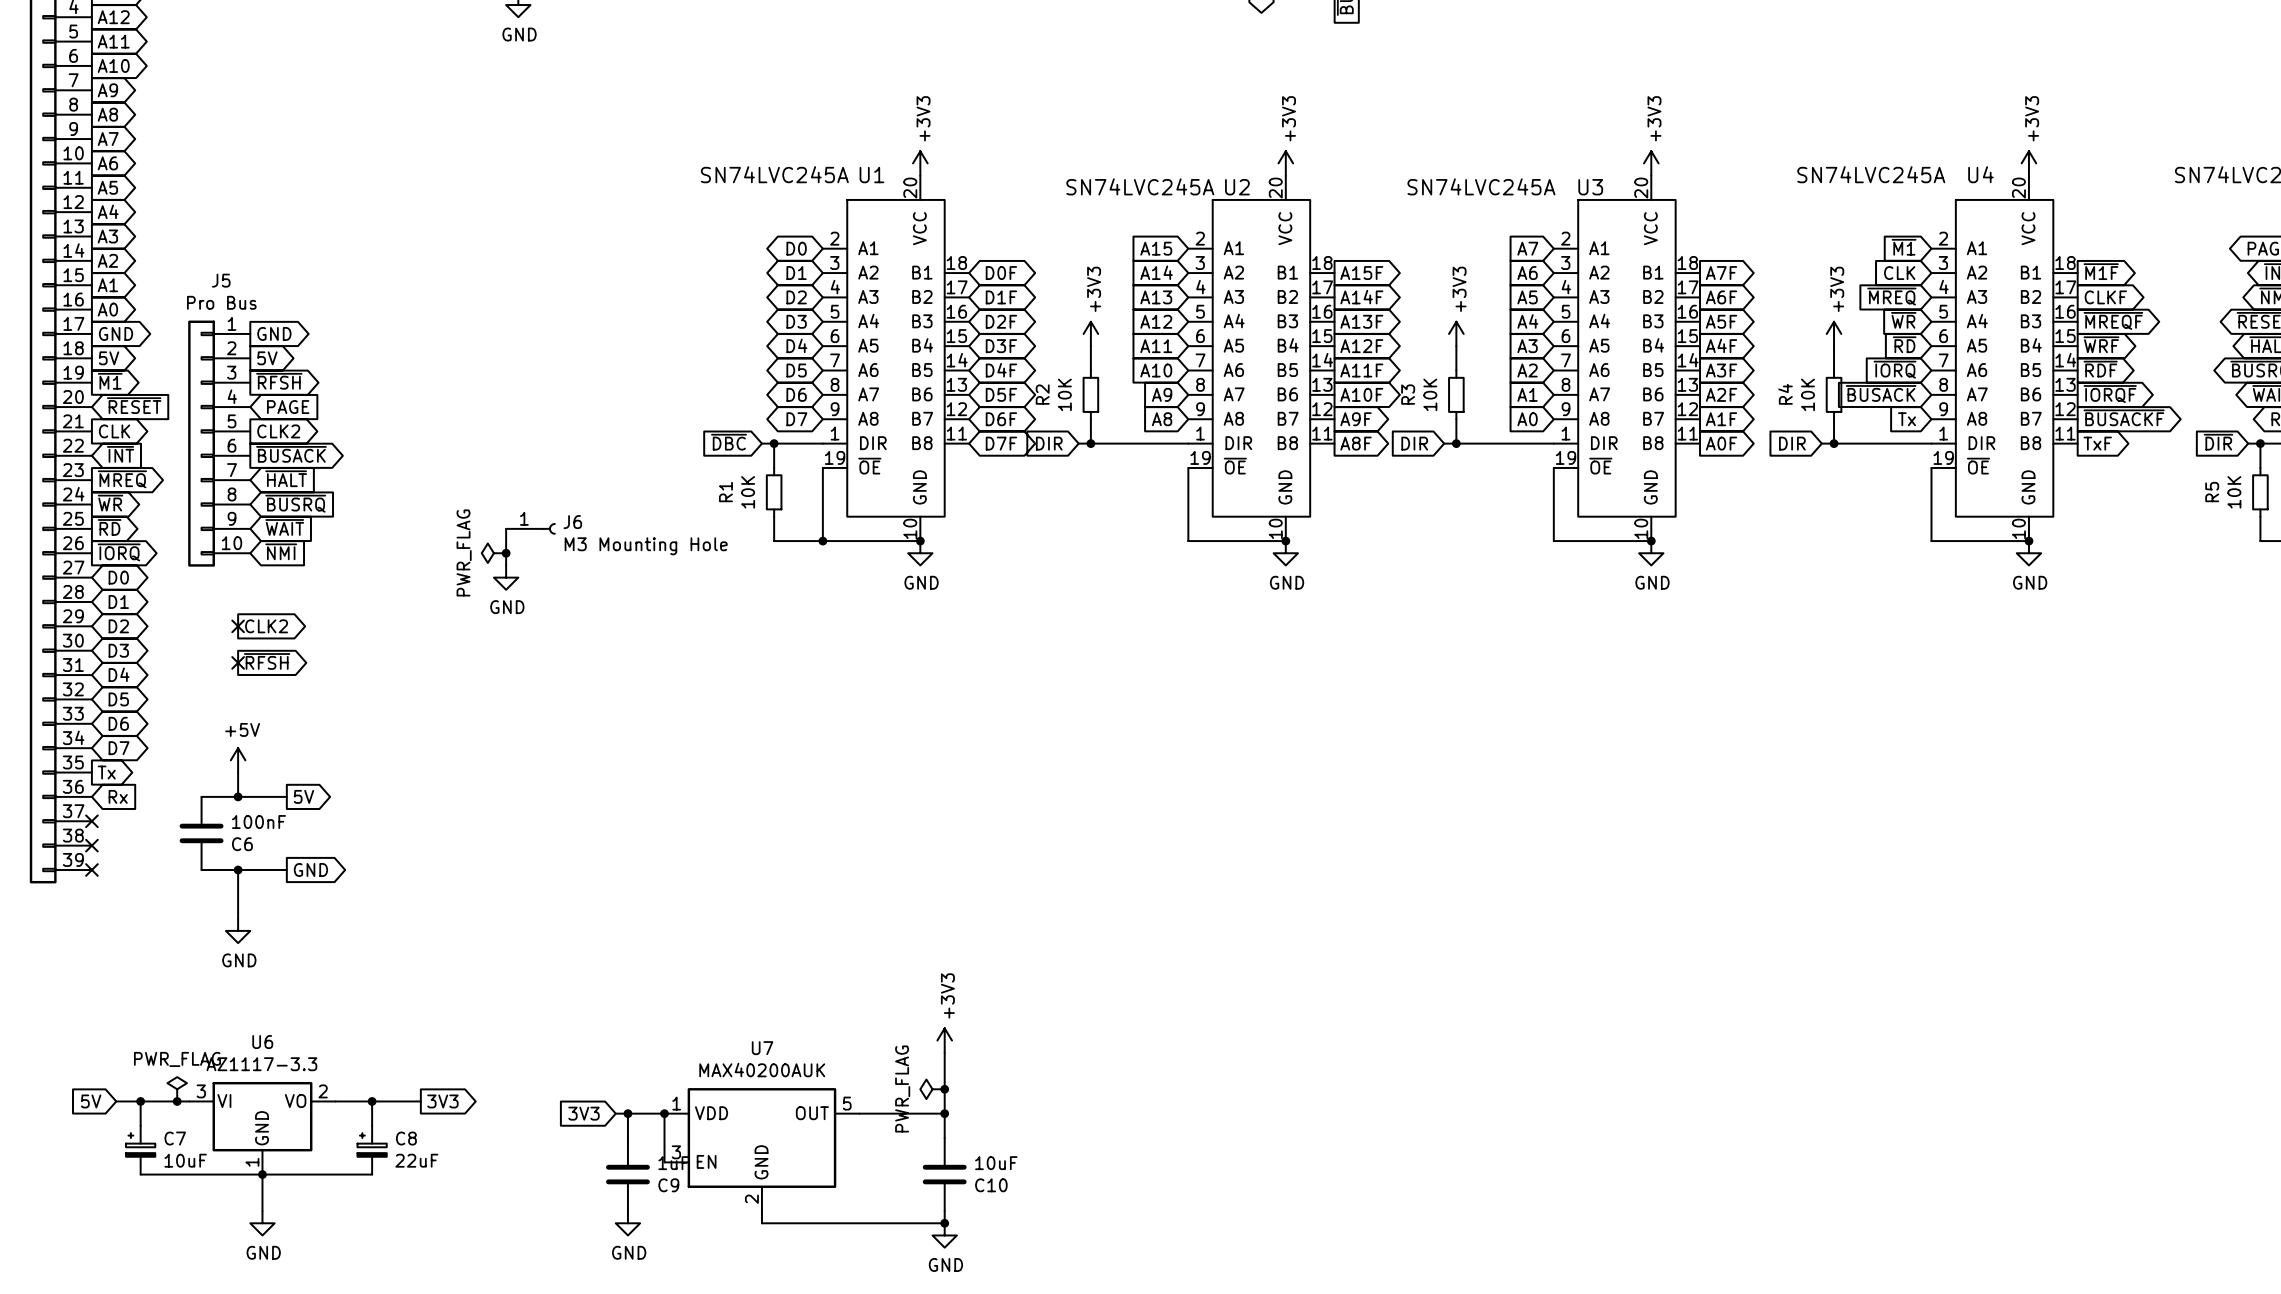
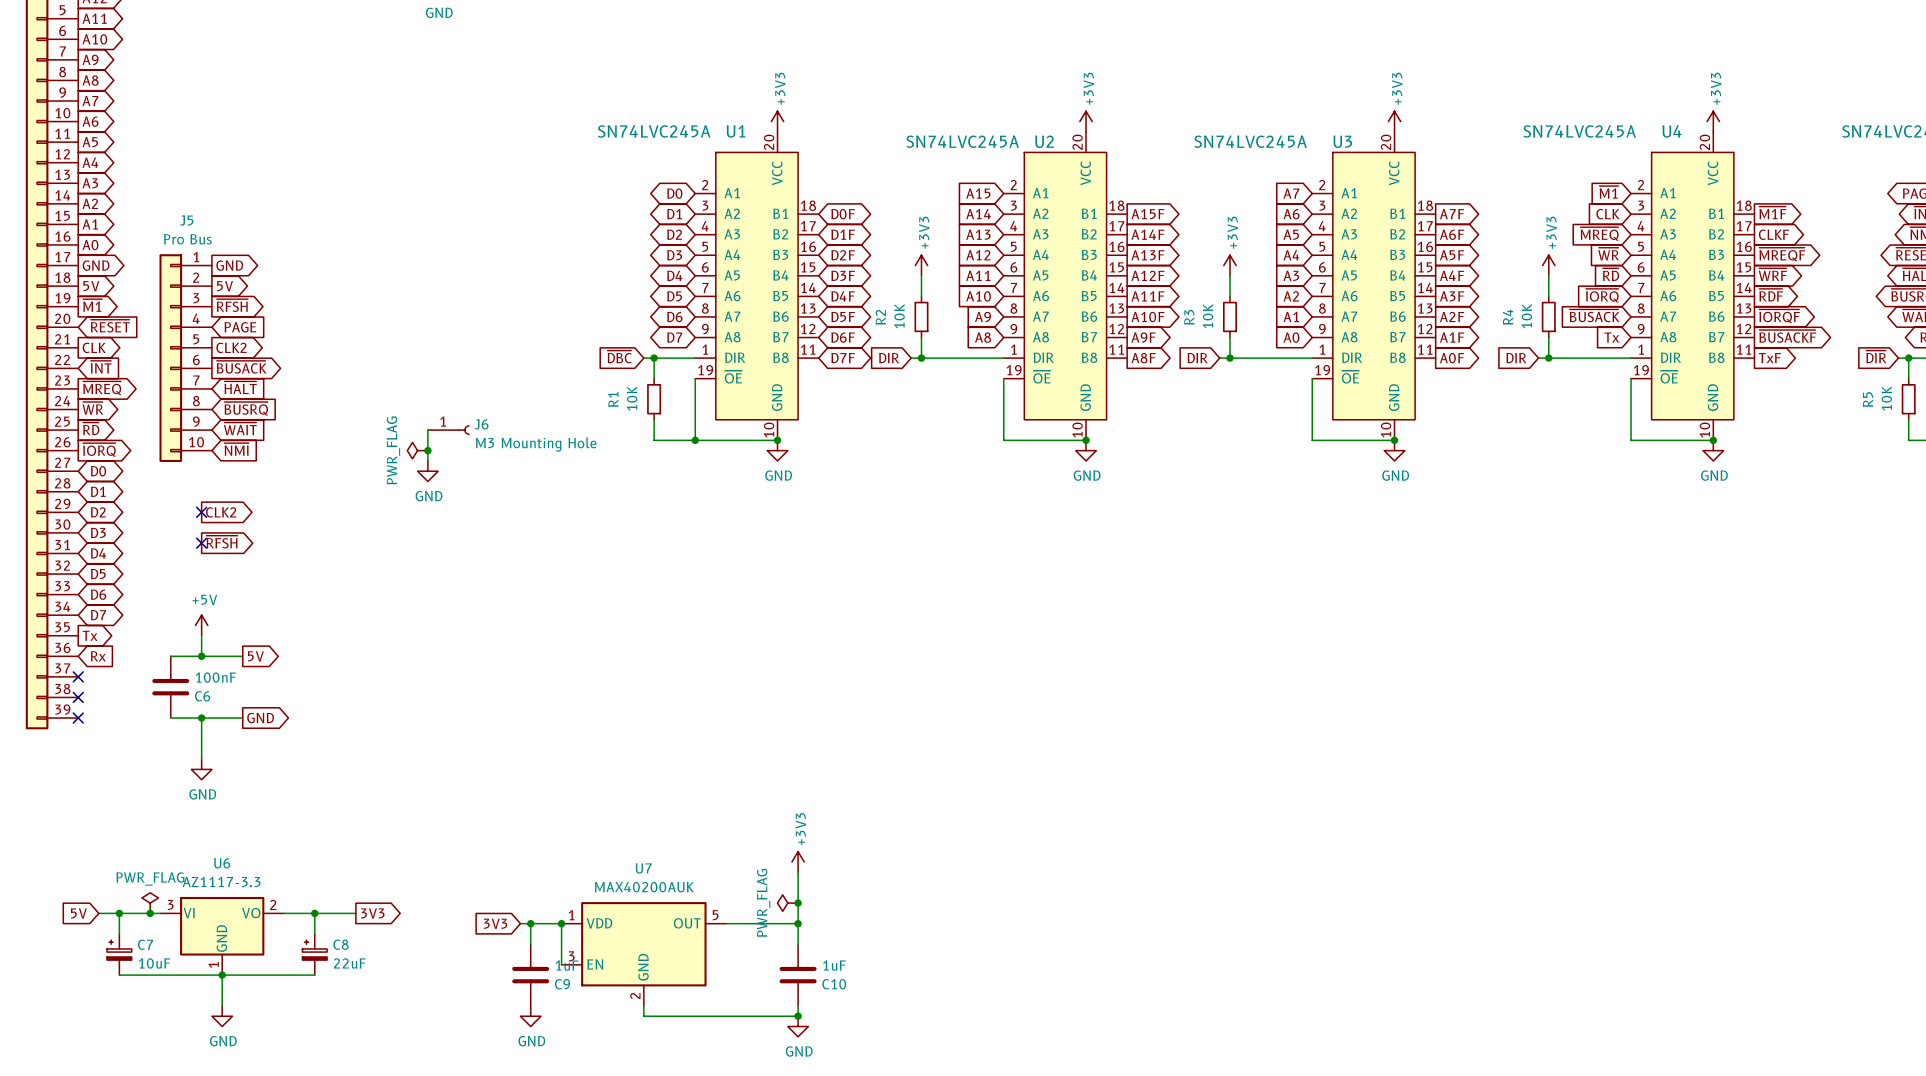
C10 value: 10uF (996, 1163) -> 1uF (834, 965)

